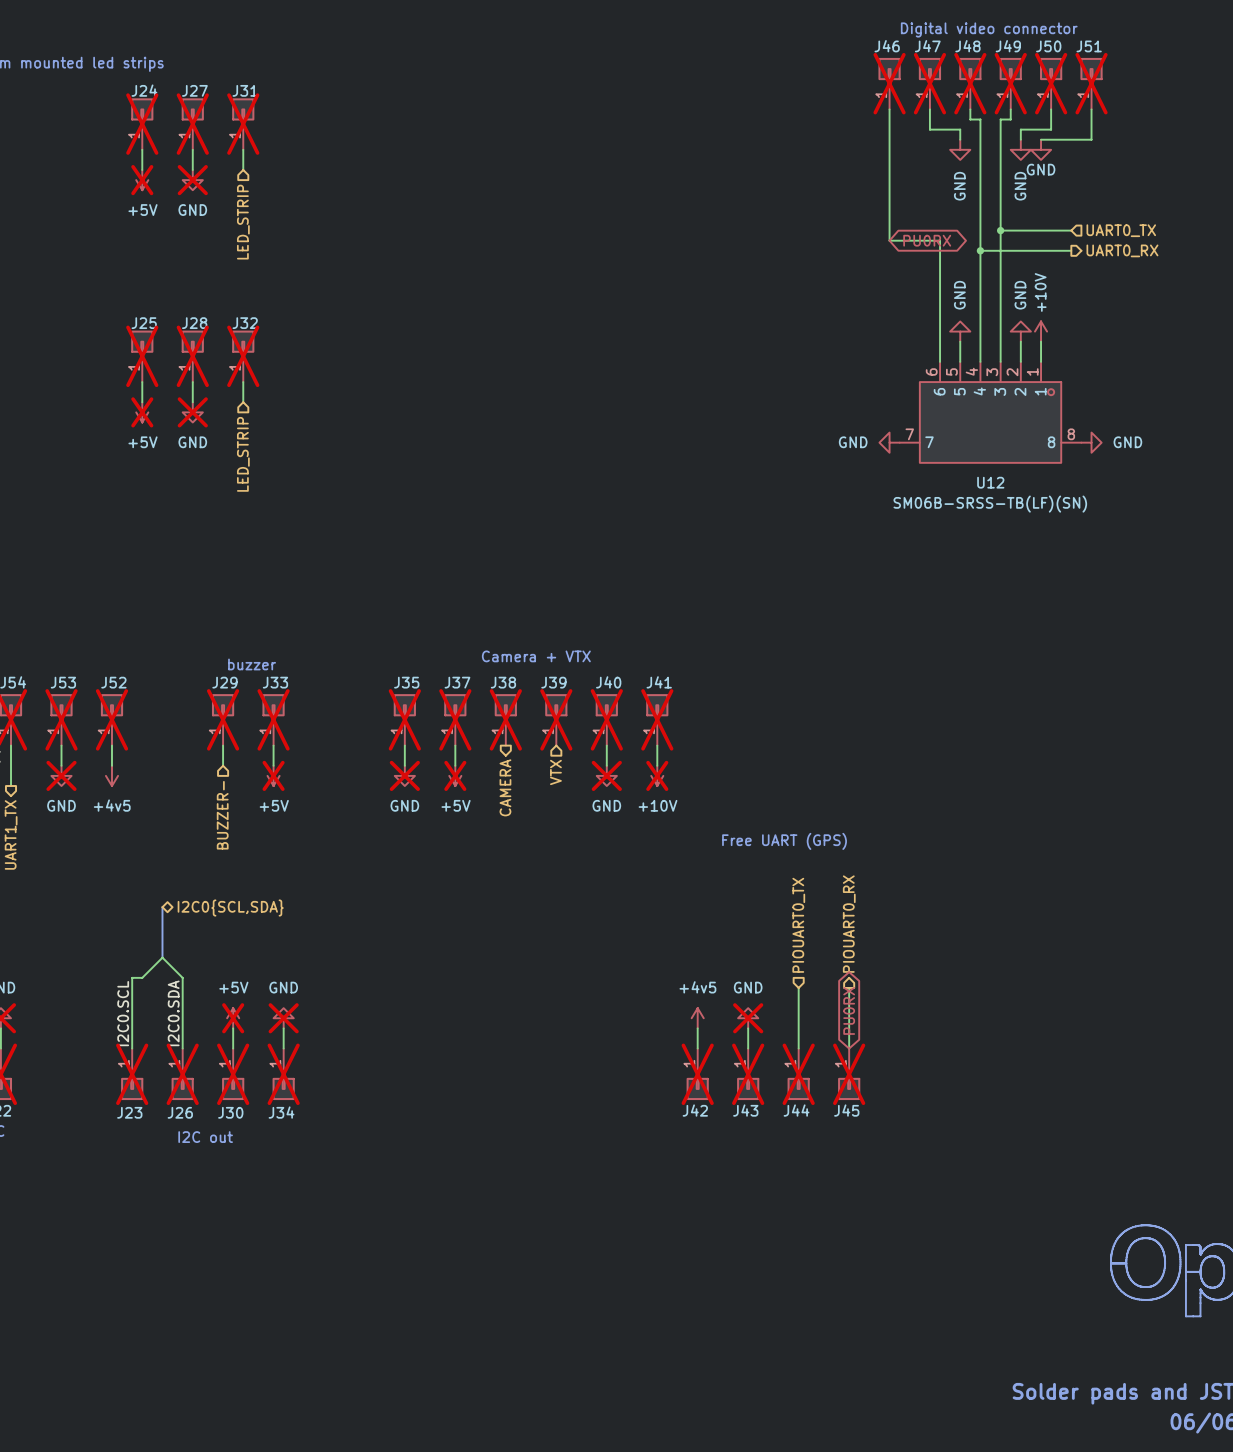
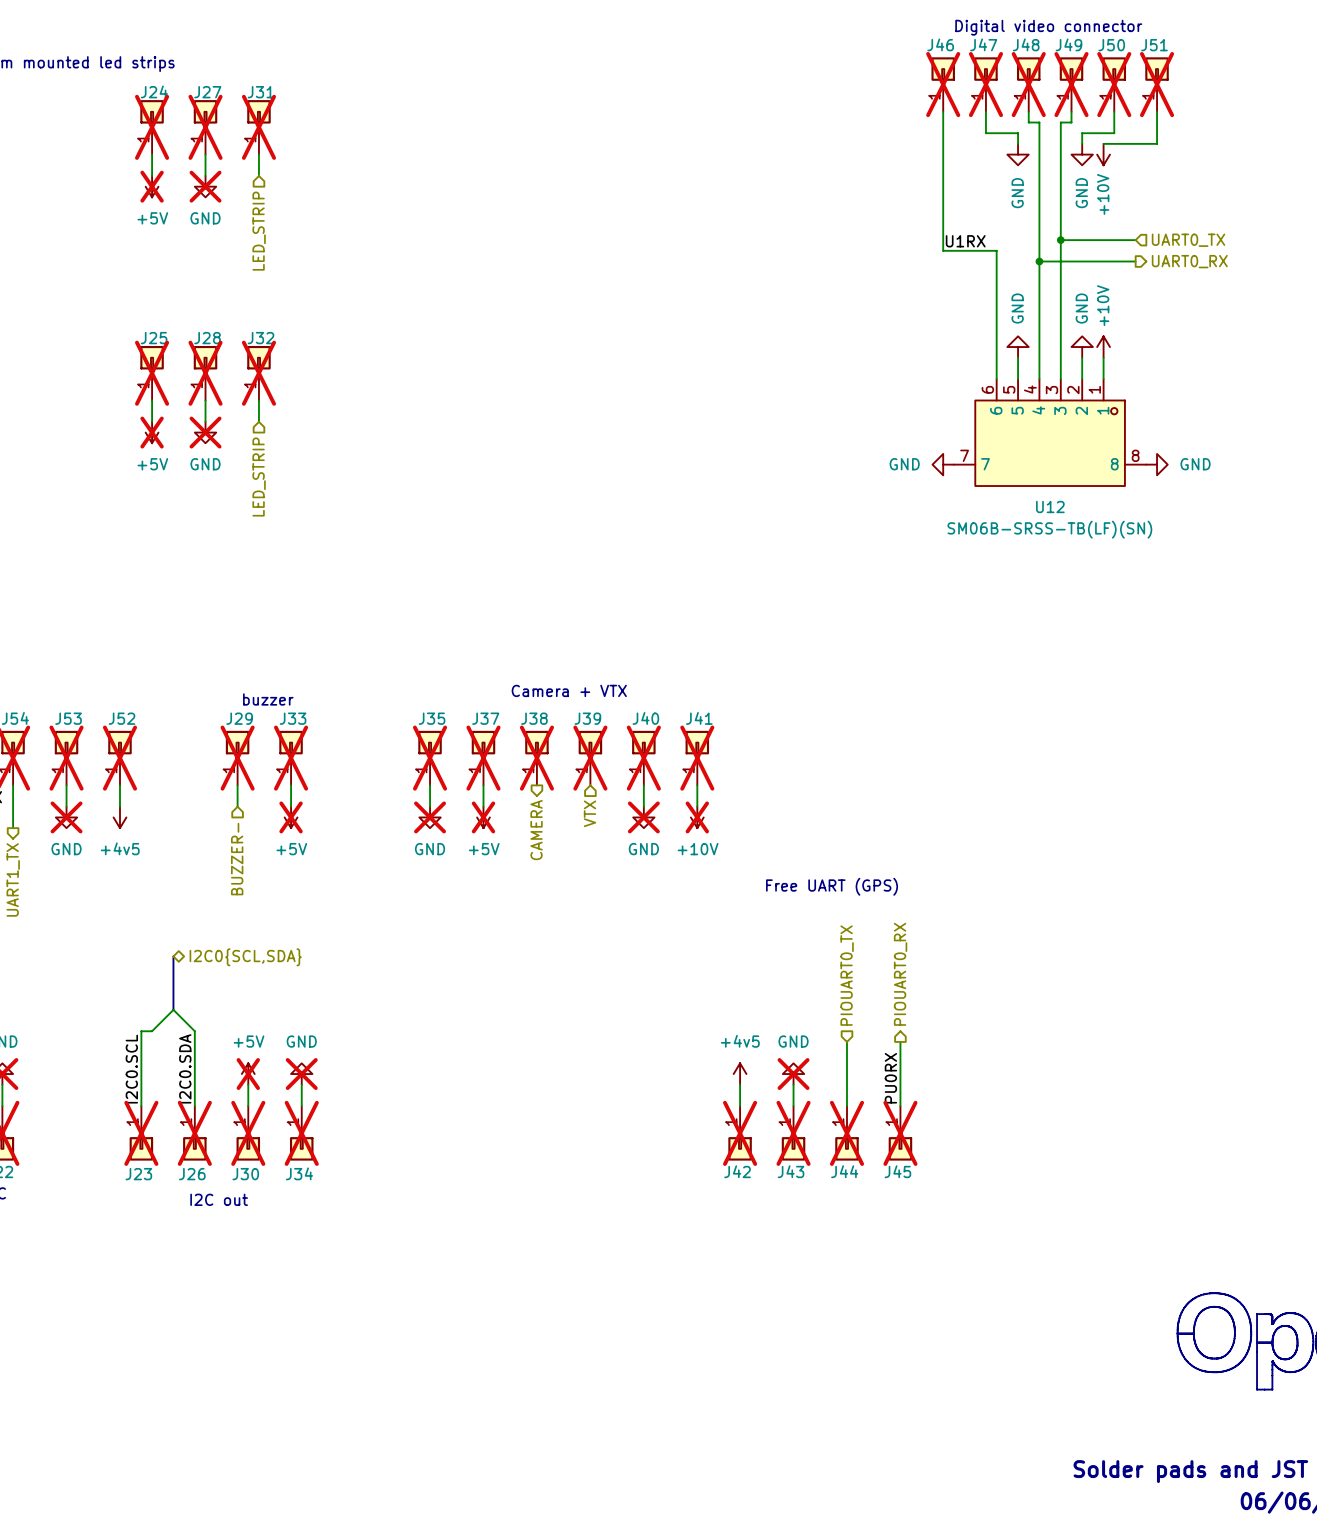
power symbol: GND (1041, 149) -> +10V (1103, 154)
label: none -> U1RX (965, 241)
global label: PU0RX (927, 240) -> none
global label: PU0RX (849, 1010) -> none
label: none -> PU0RX (890, 1078)

